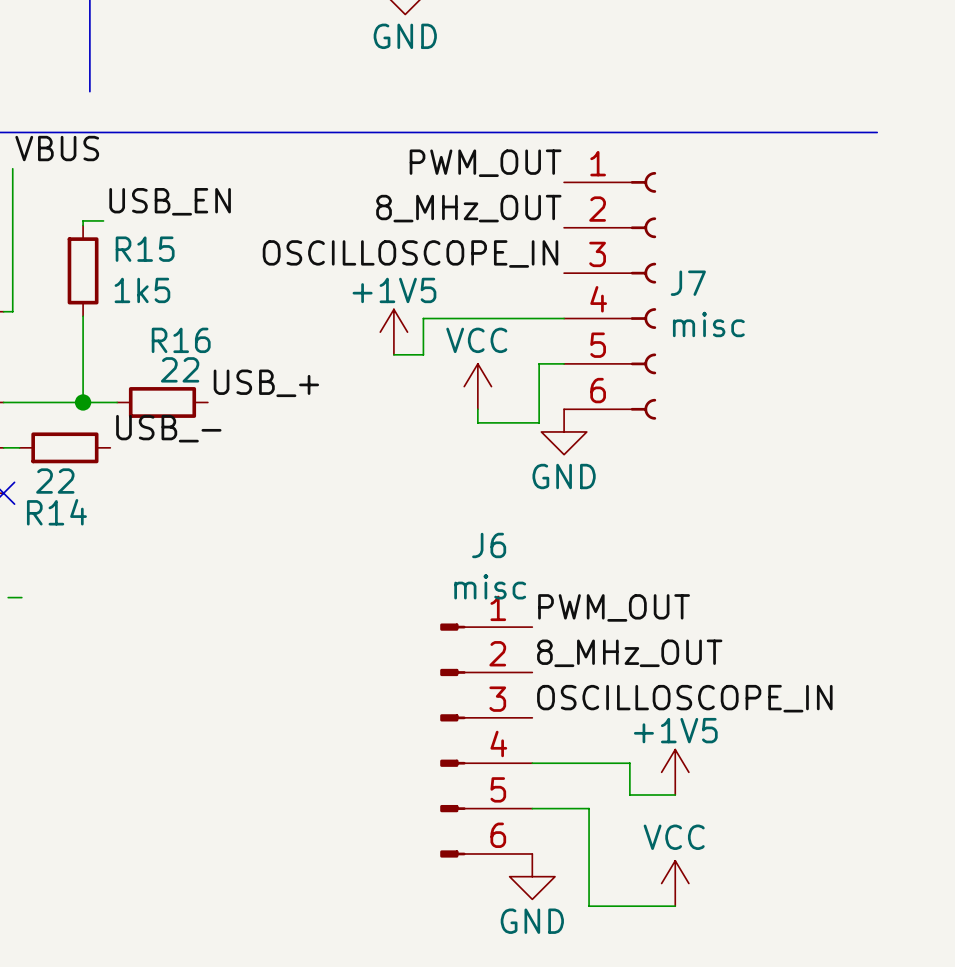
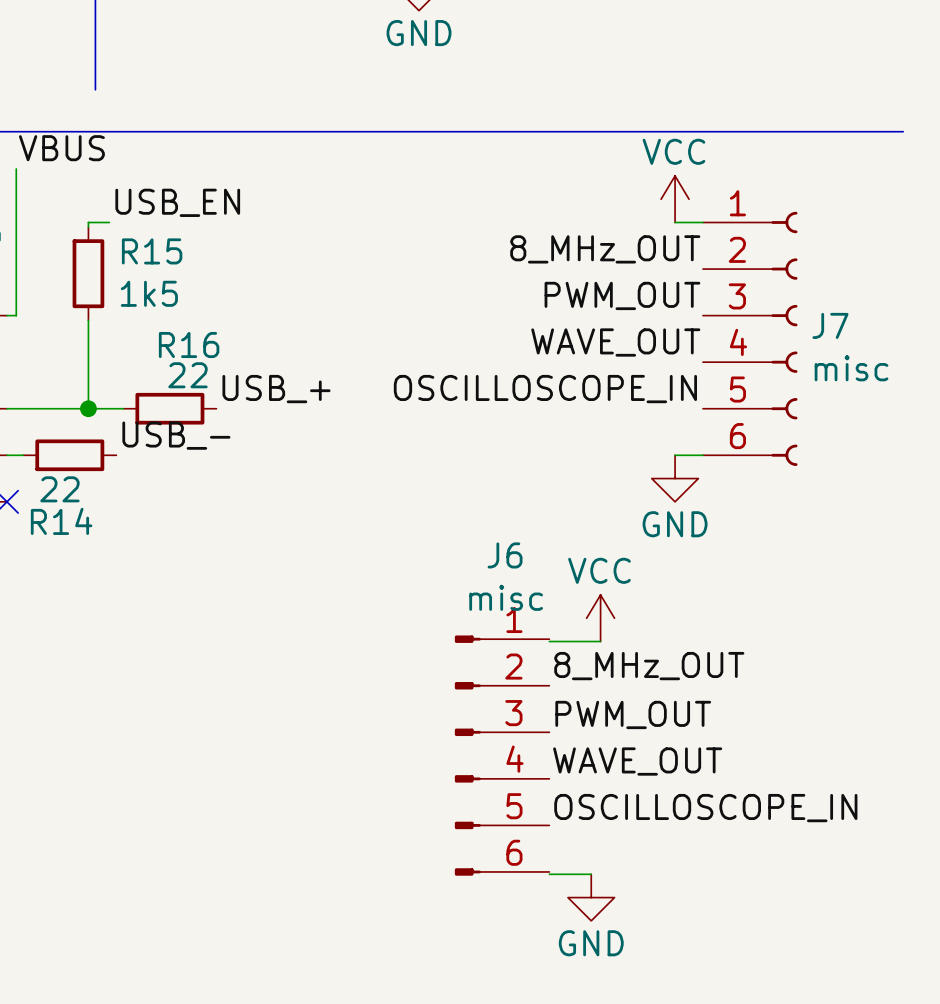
label: PWM_OUT (485, 163) -> none
power symbol: none -> VCC (675, 199)
label position: 8_MHz_OUT (468, 208) -> 8_MHz_OUT (605, 249)
wire: none -> (675, 222) (703, 222)
label: OSCILLOSCOPE_IN (410, 253) -> none
label: none -> PWM_OUT (622, 295)
J7 position: (610, 295) -> (750, 338)
wire: (564, 318) (423, 318) (423, 354) (393, 354) -> none
power symbol: +1V5 (393, 332) -> none
label: none -> WAVE_OUT (615, 342)
wire: (564, 363) (539, 363) (539, 422) (477, 422) (477, 409) -> none
label: none -> OSCILLOSCOPE_IN (545, 389)
power symbol: VCC (477, 386) -> none
power symbol position: GND (564, 431) -> GND (675, 478)
wire: none -> (675, 455) (703, 455)
wire: (8, 597) (21, 597) -> none
power symbol: none -> VCC (600, 618)
label position: PWM_OUT (614, 607) -> PWM_OUT (633, 714)
wire: none -> (549, 641) (600, 641)
label position: OSCILLOSCOPE_IN (684, 698) -> OSCILLOSCOPE_IN (705, 808)
label: none -> WAVE_OUT (637, 761)
wire: (532, 763) (629, 763) (629, 795) (675, 795) -> none
power symbol: +1V5 (675, 772) -> none
wire: (532, 808) (589, 808) (589, 906) (675, 906) -> none
wire: none -> (549, 874) (591, 874)
power symbol position: GND (532, 876) -> GND (591, 897)
power symbol: VCC (675, 883) -> none

